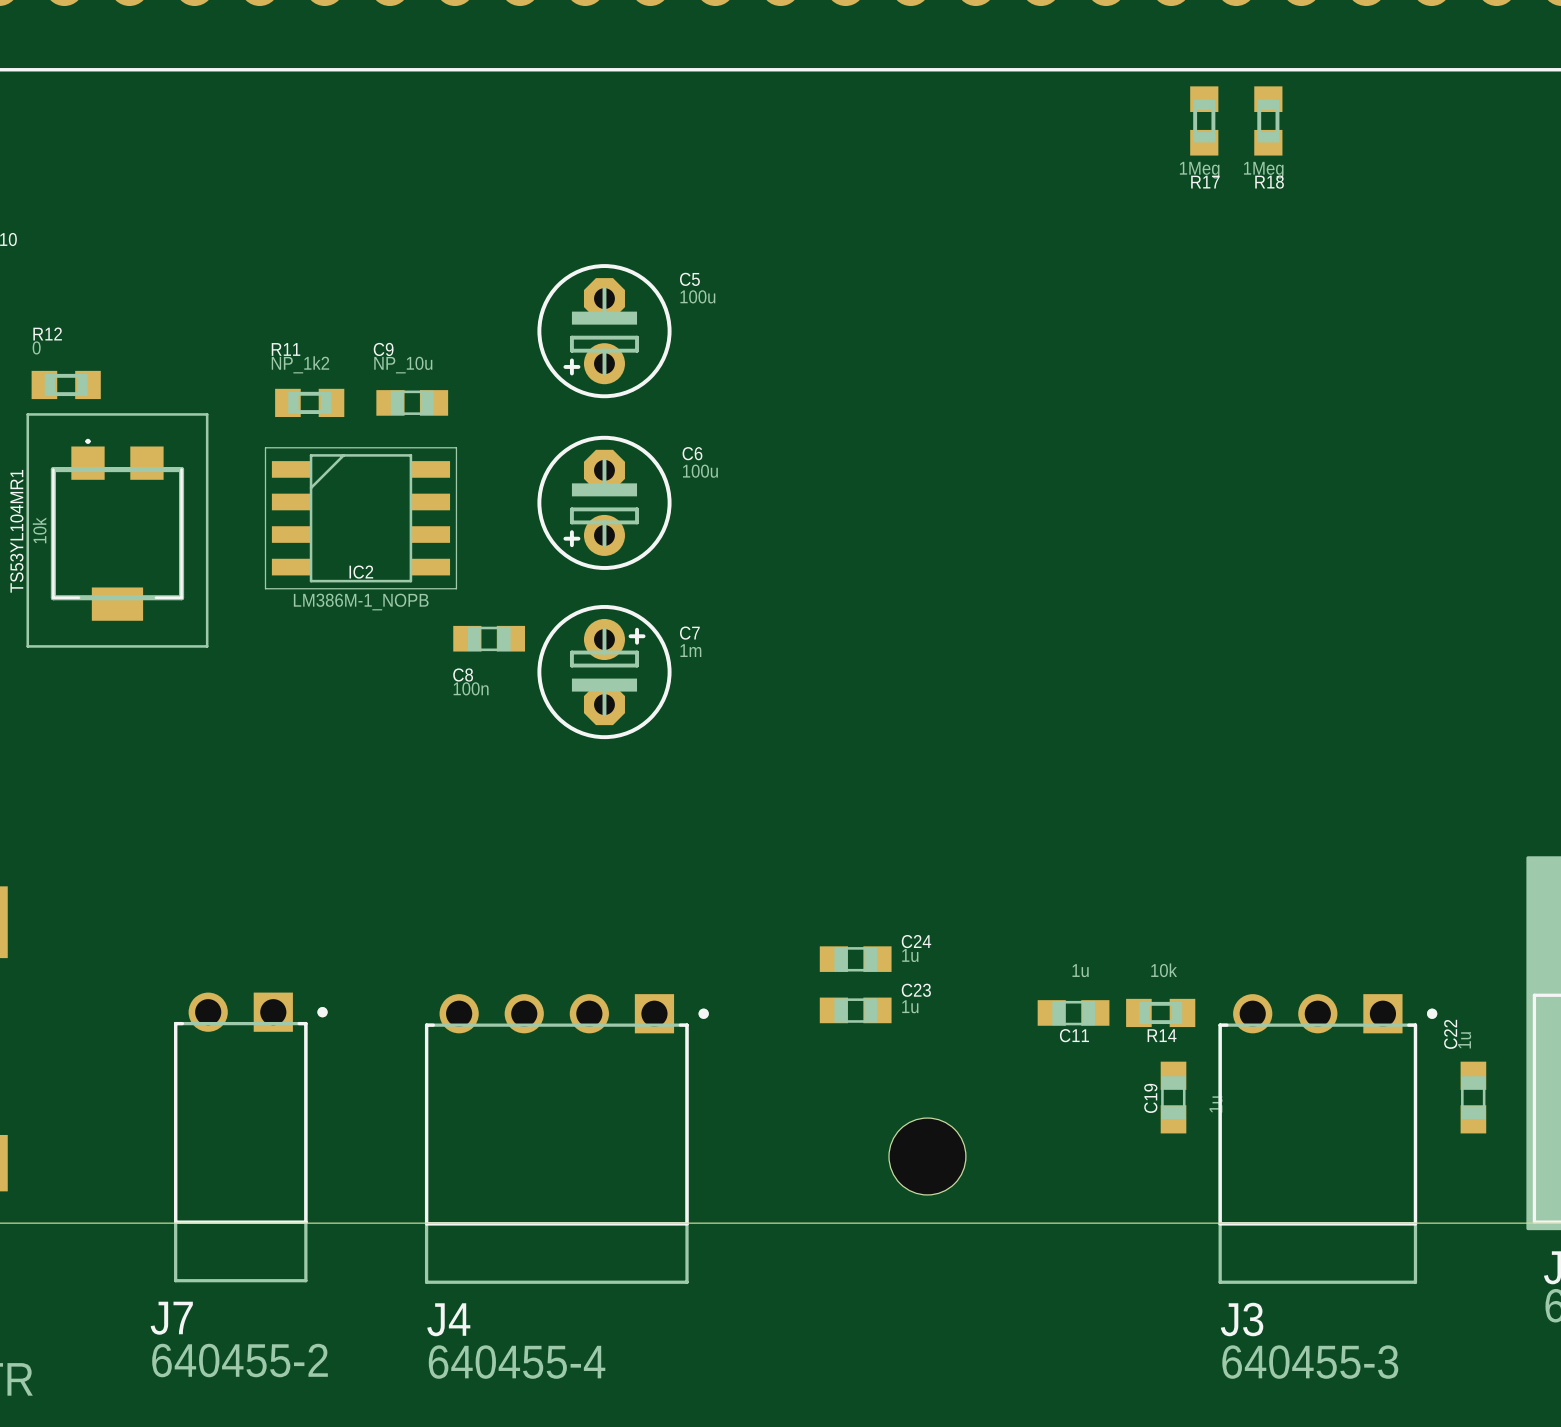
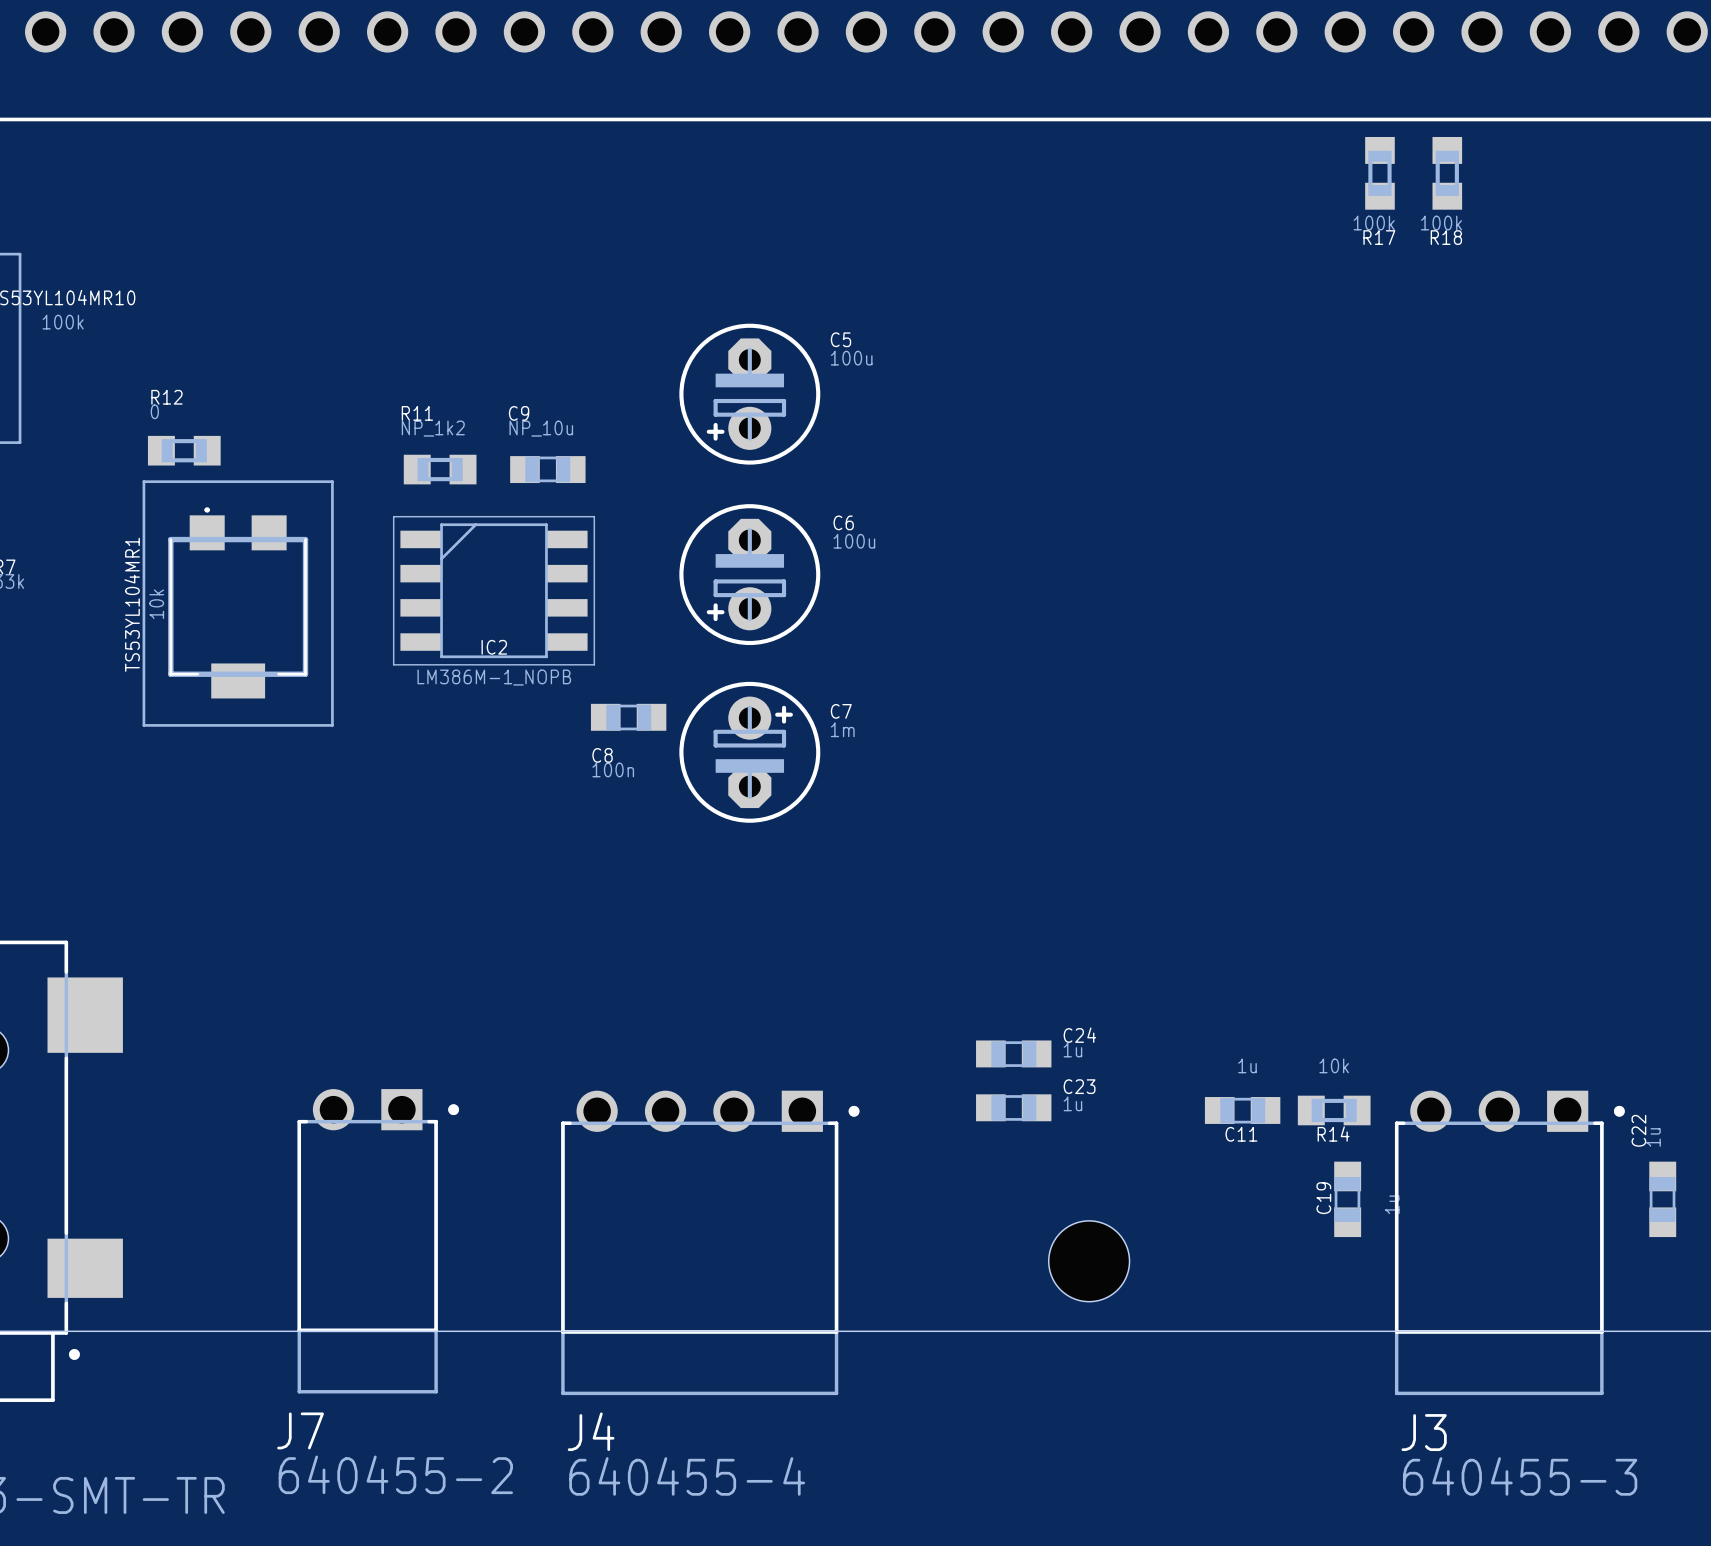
R17 value: 1Meg (1199, 170) -> 100k (1374, 223)
R18 value: 1Meg (1263, 170) -> 100k (1441, 223)

